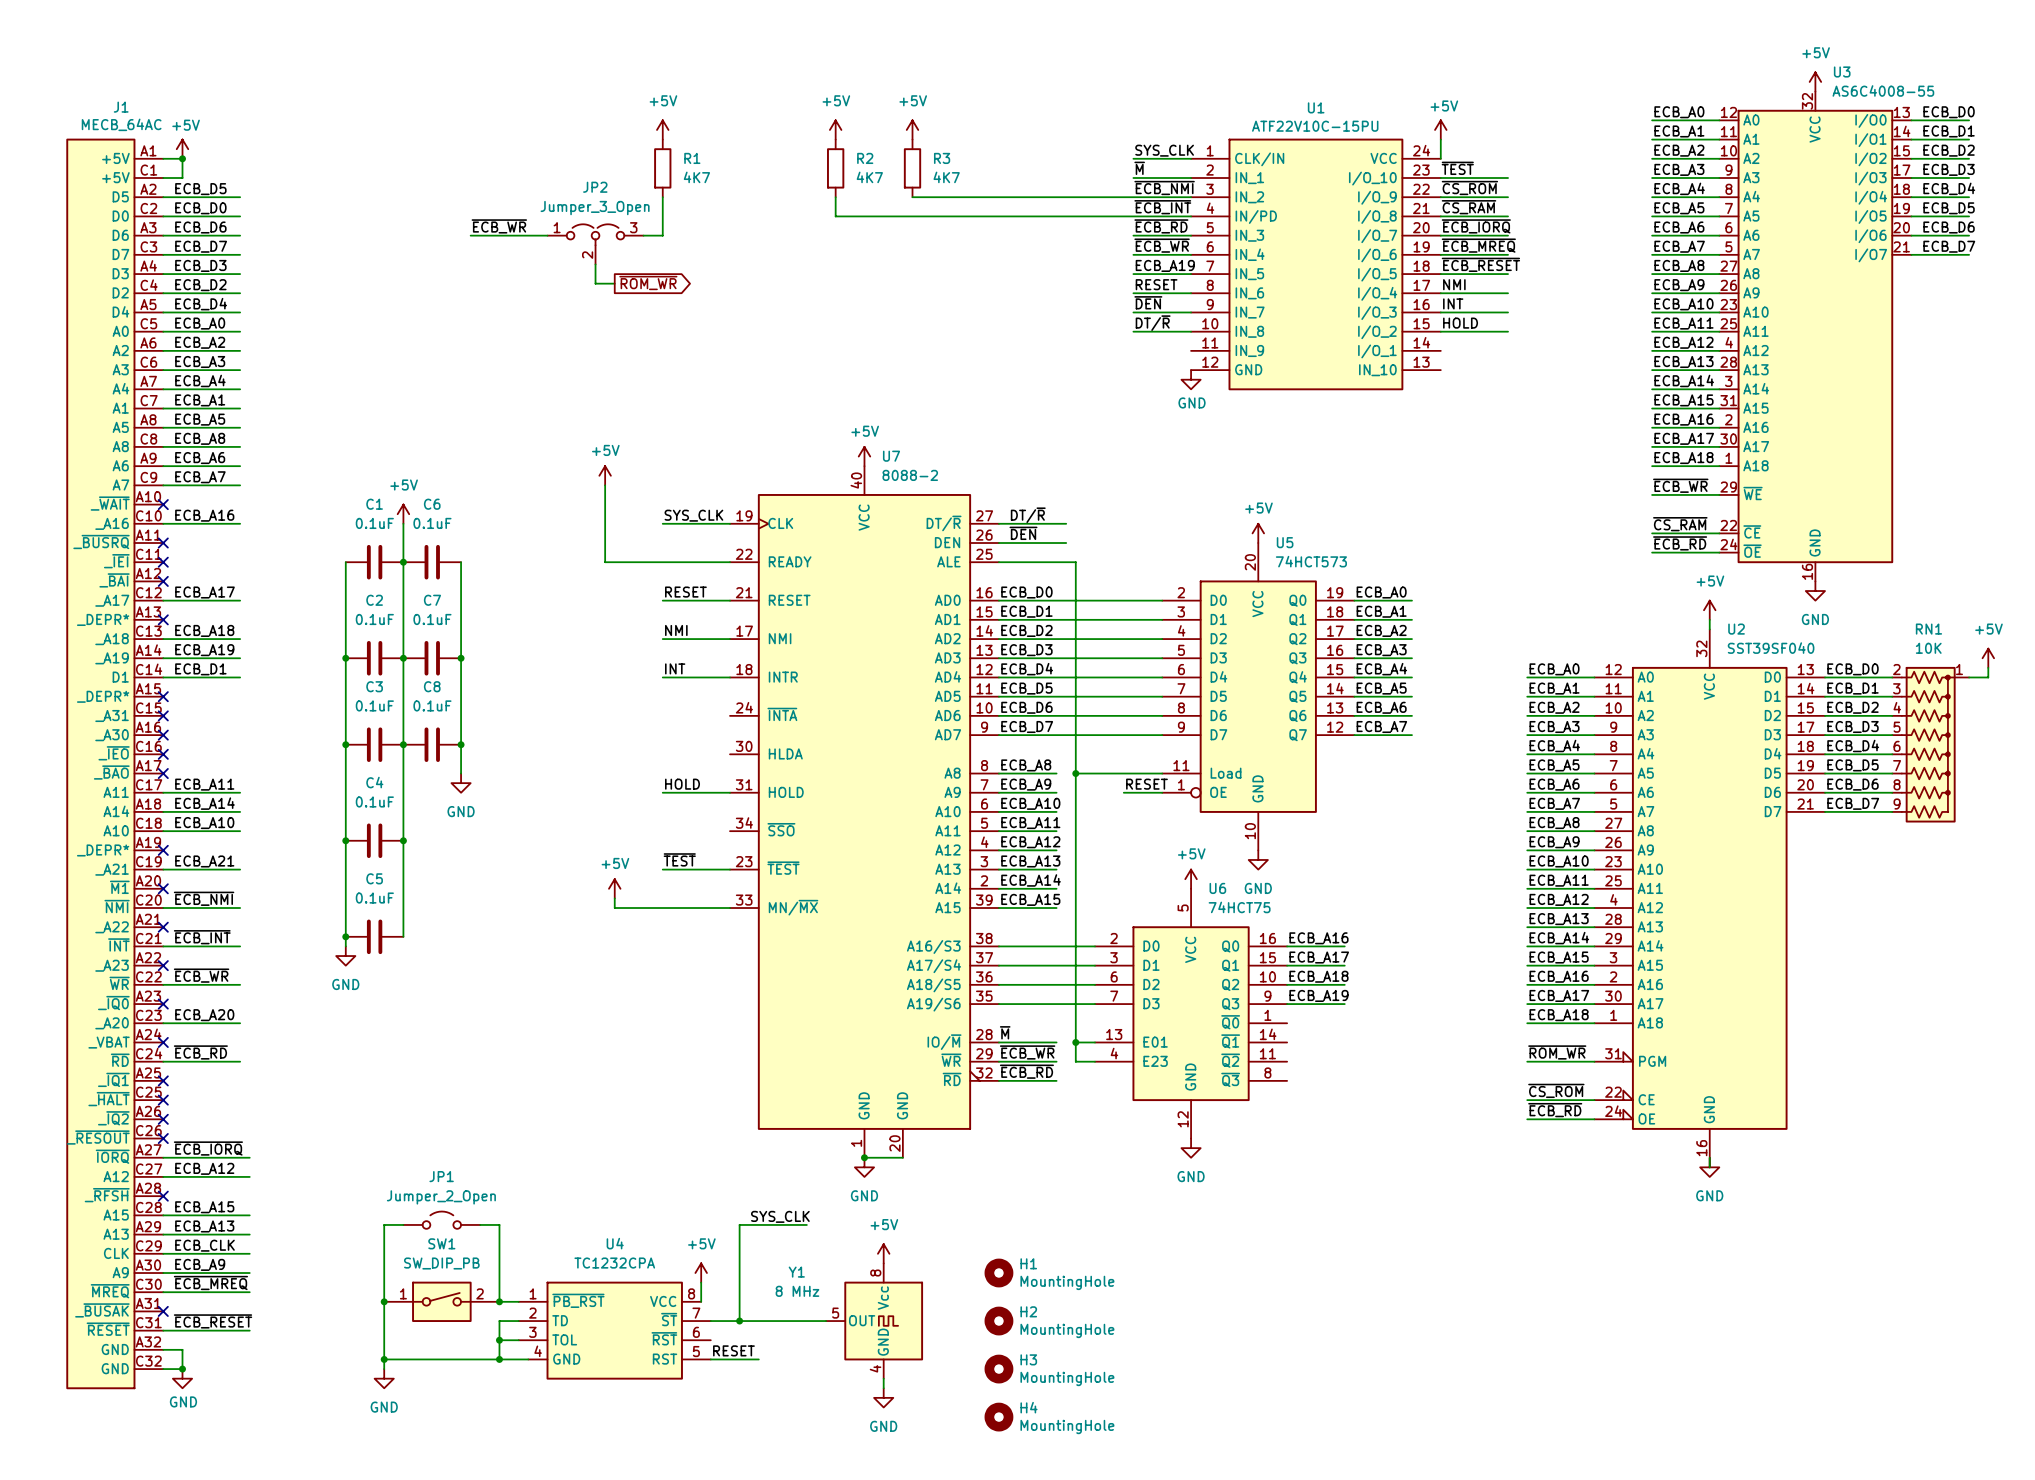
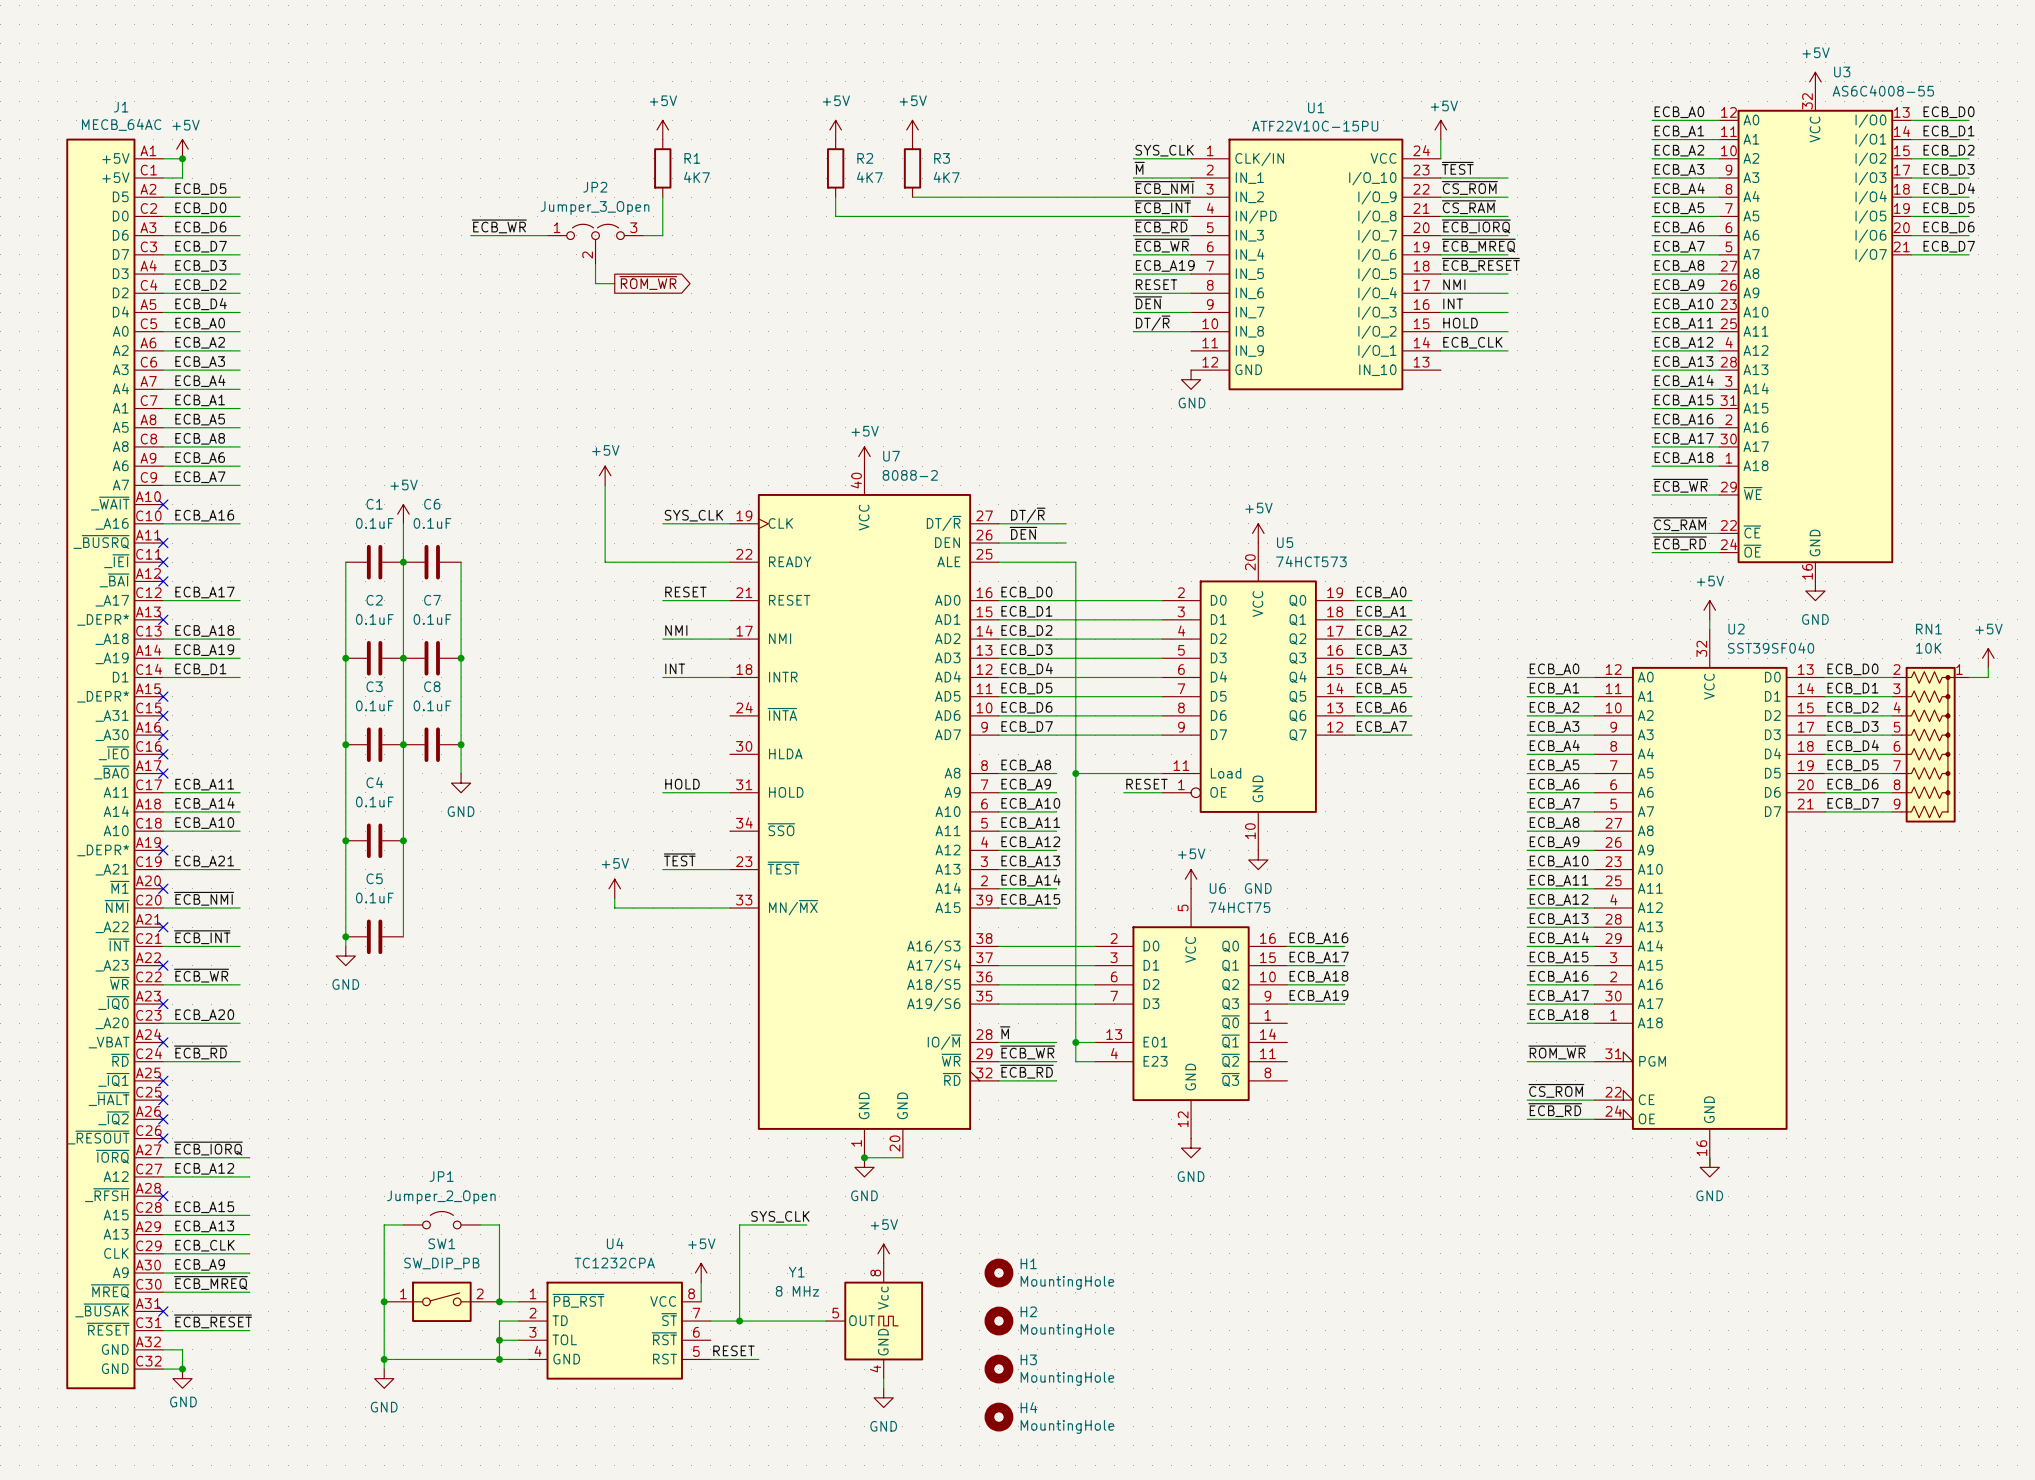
label: none -> ECB_CLK (1472, 342)
wire: none -> (1440, 350) (1508, 350)

